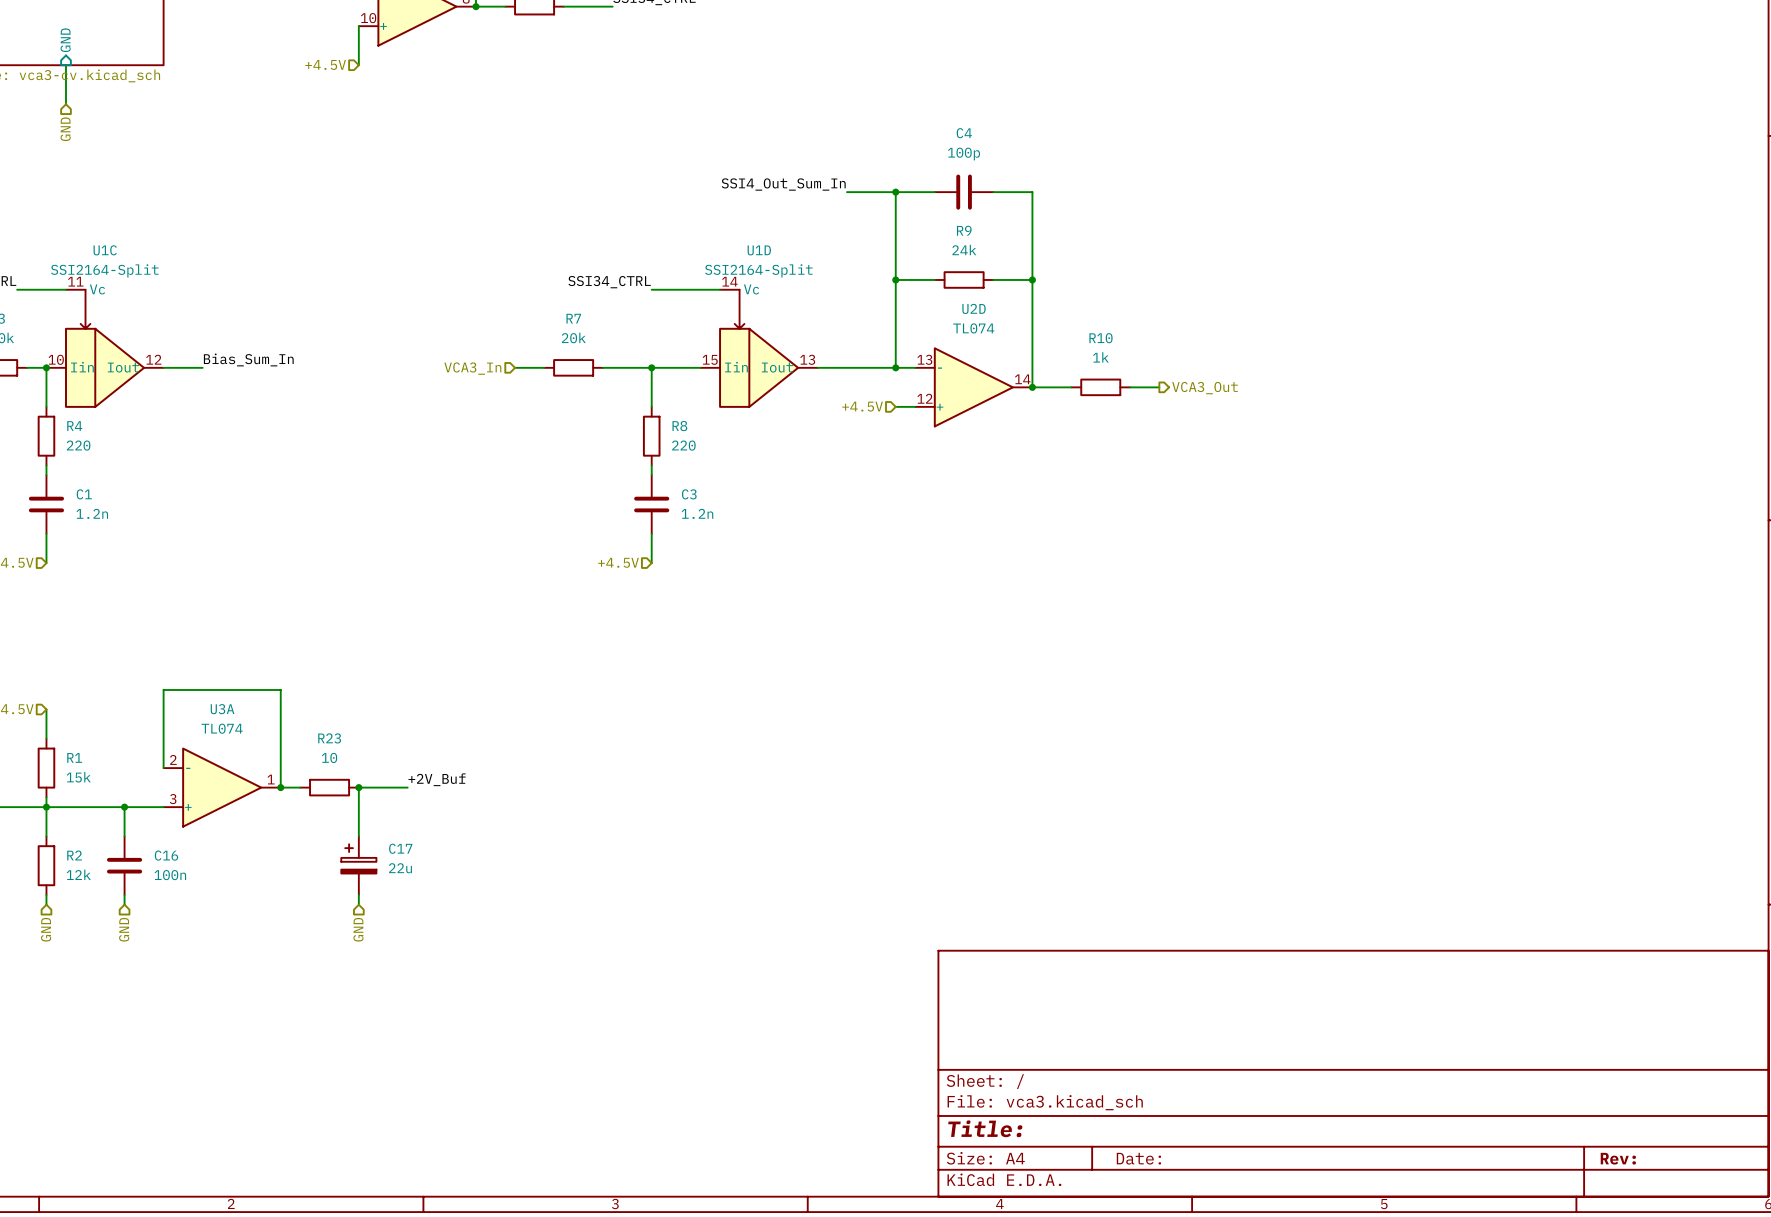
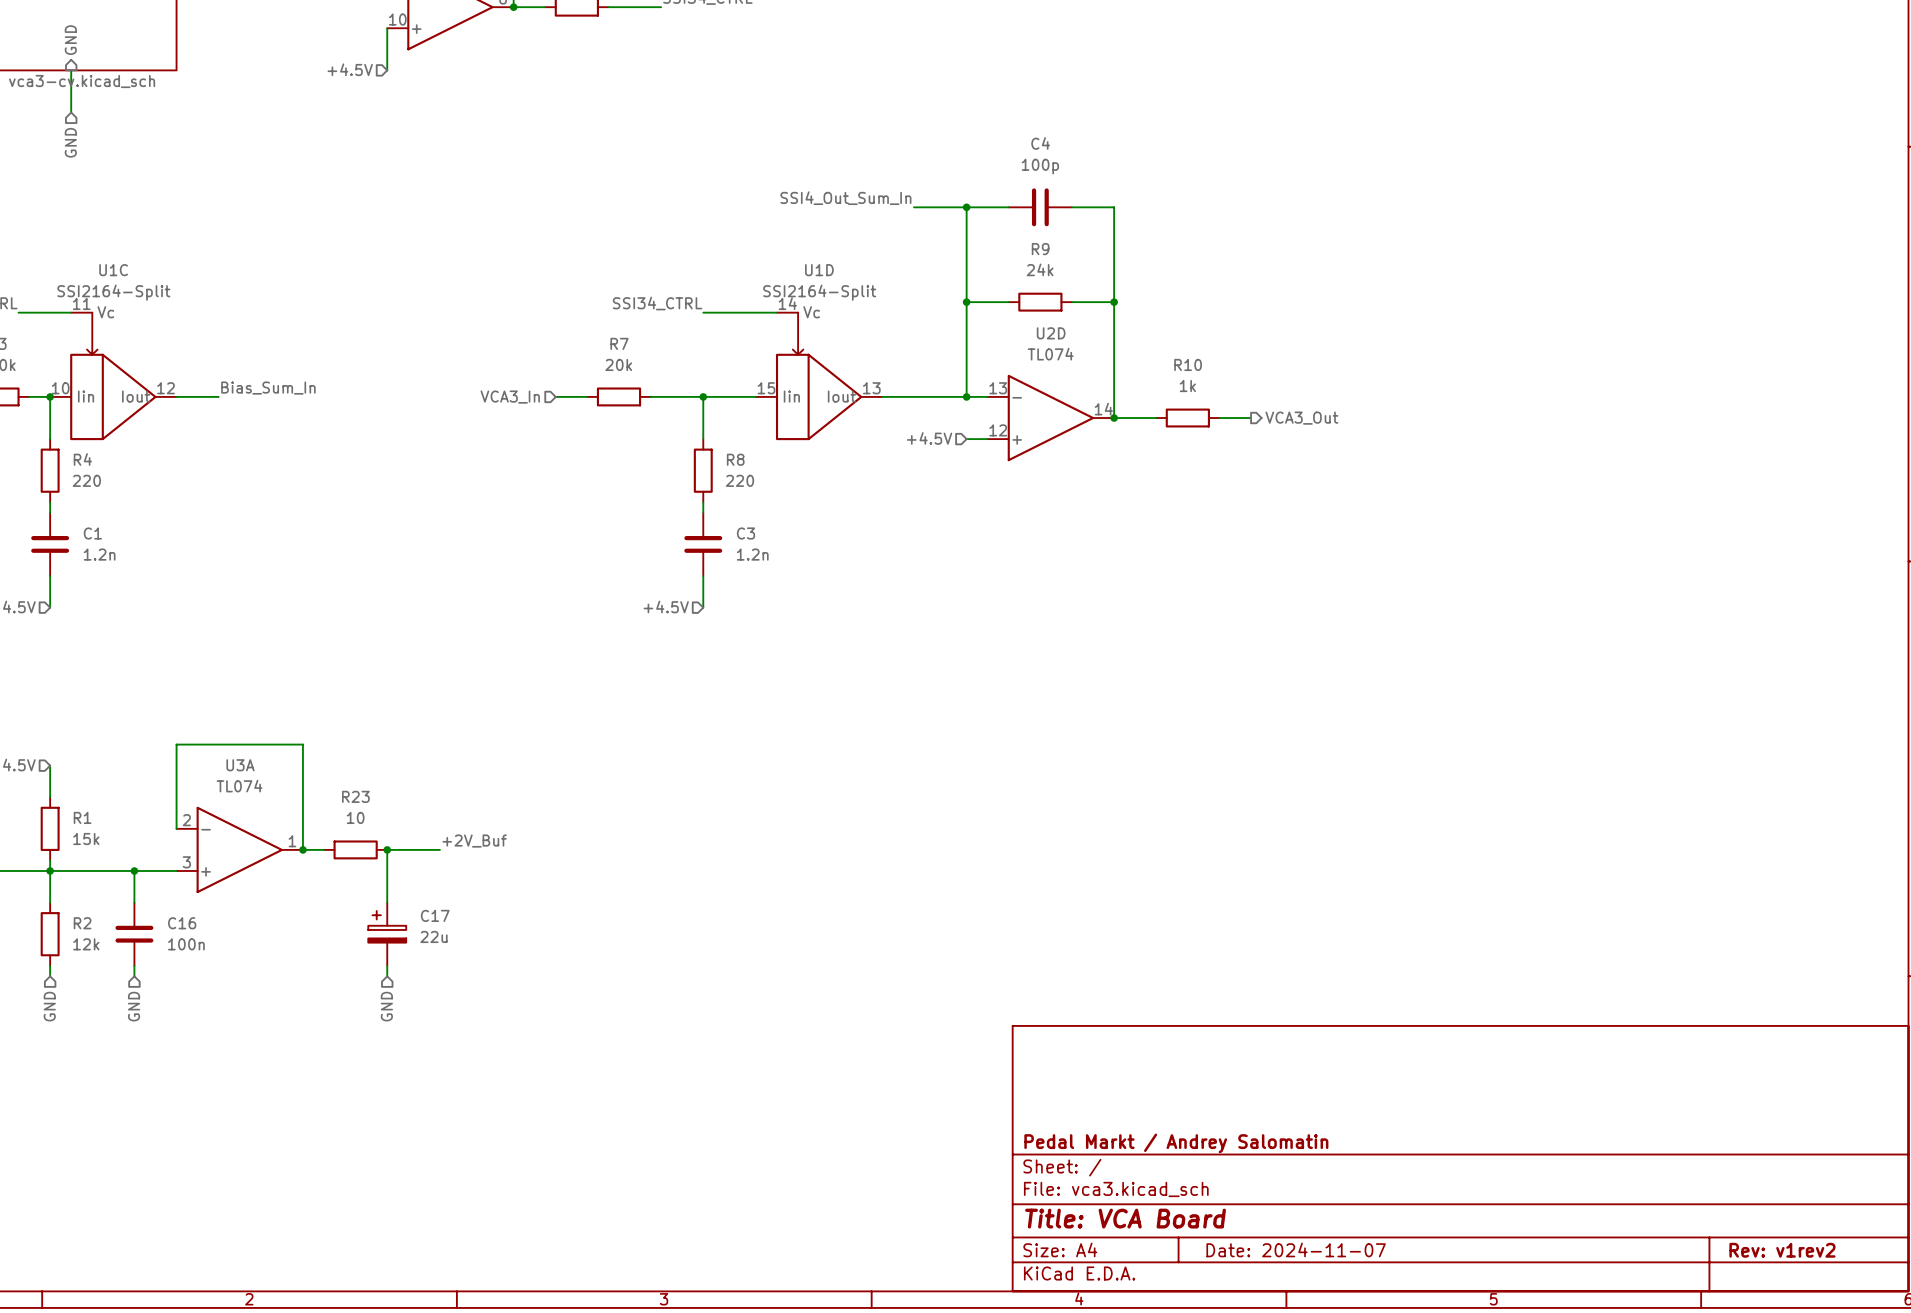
title block: none -> Pedal Markt / Andrey Salomatin (1176, 1143)
title block: Title: (985, 1128) -> Title: VCA Board (1125, 1218)
title block: Date: (1138, 1158) -> Date: 2024-11-07 (1296, 1249)
title block: Rev: (1618, 1158) -> Rev: v1rev2 (1782, 1250)

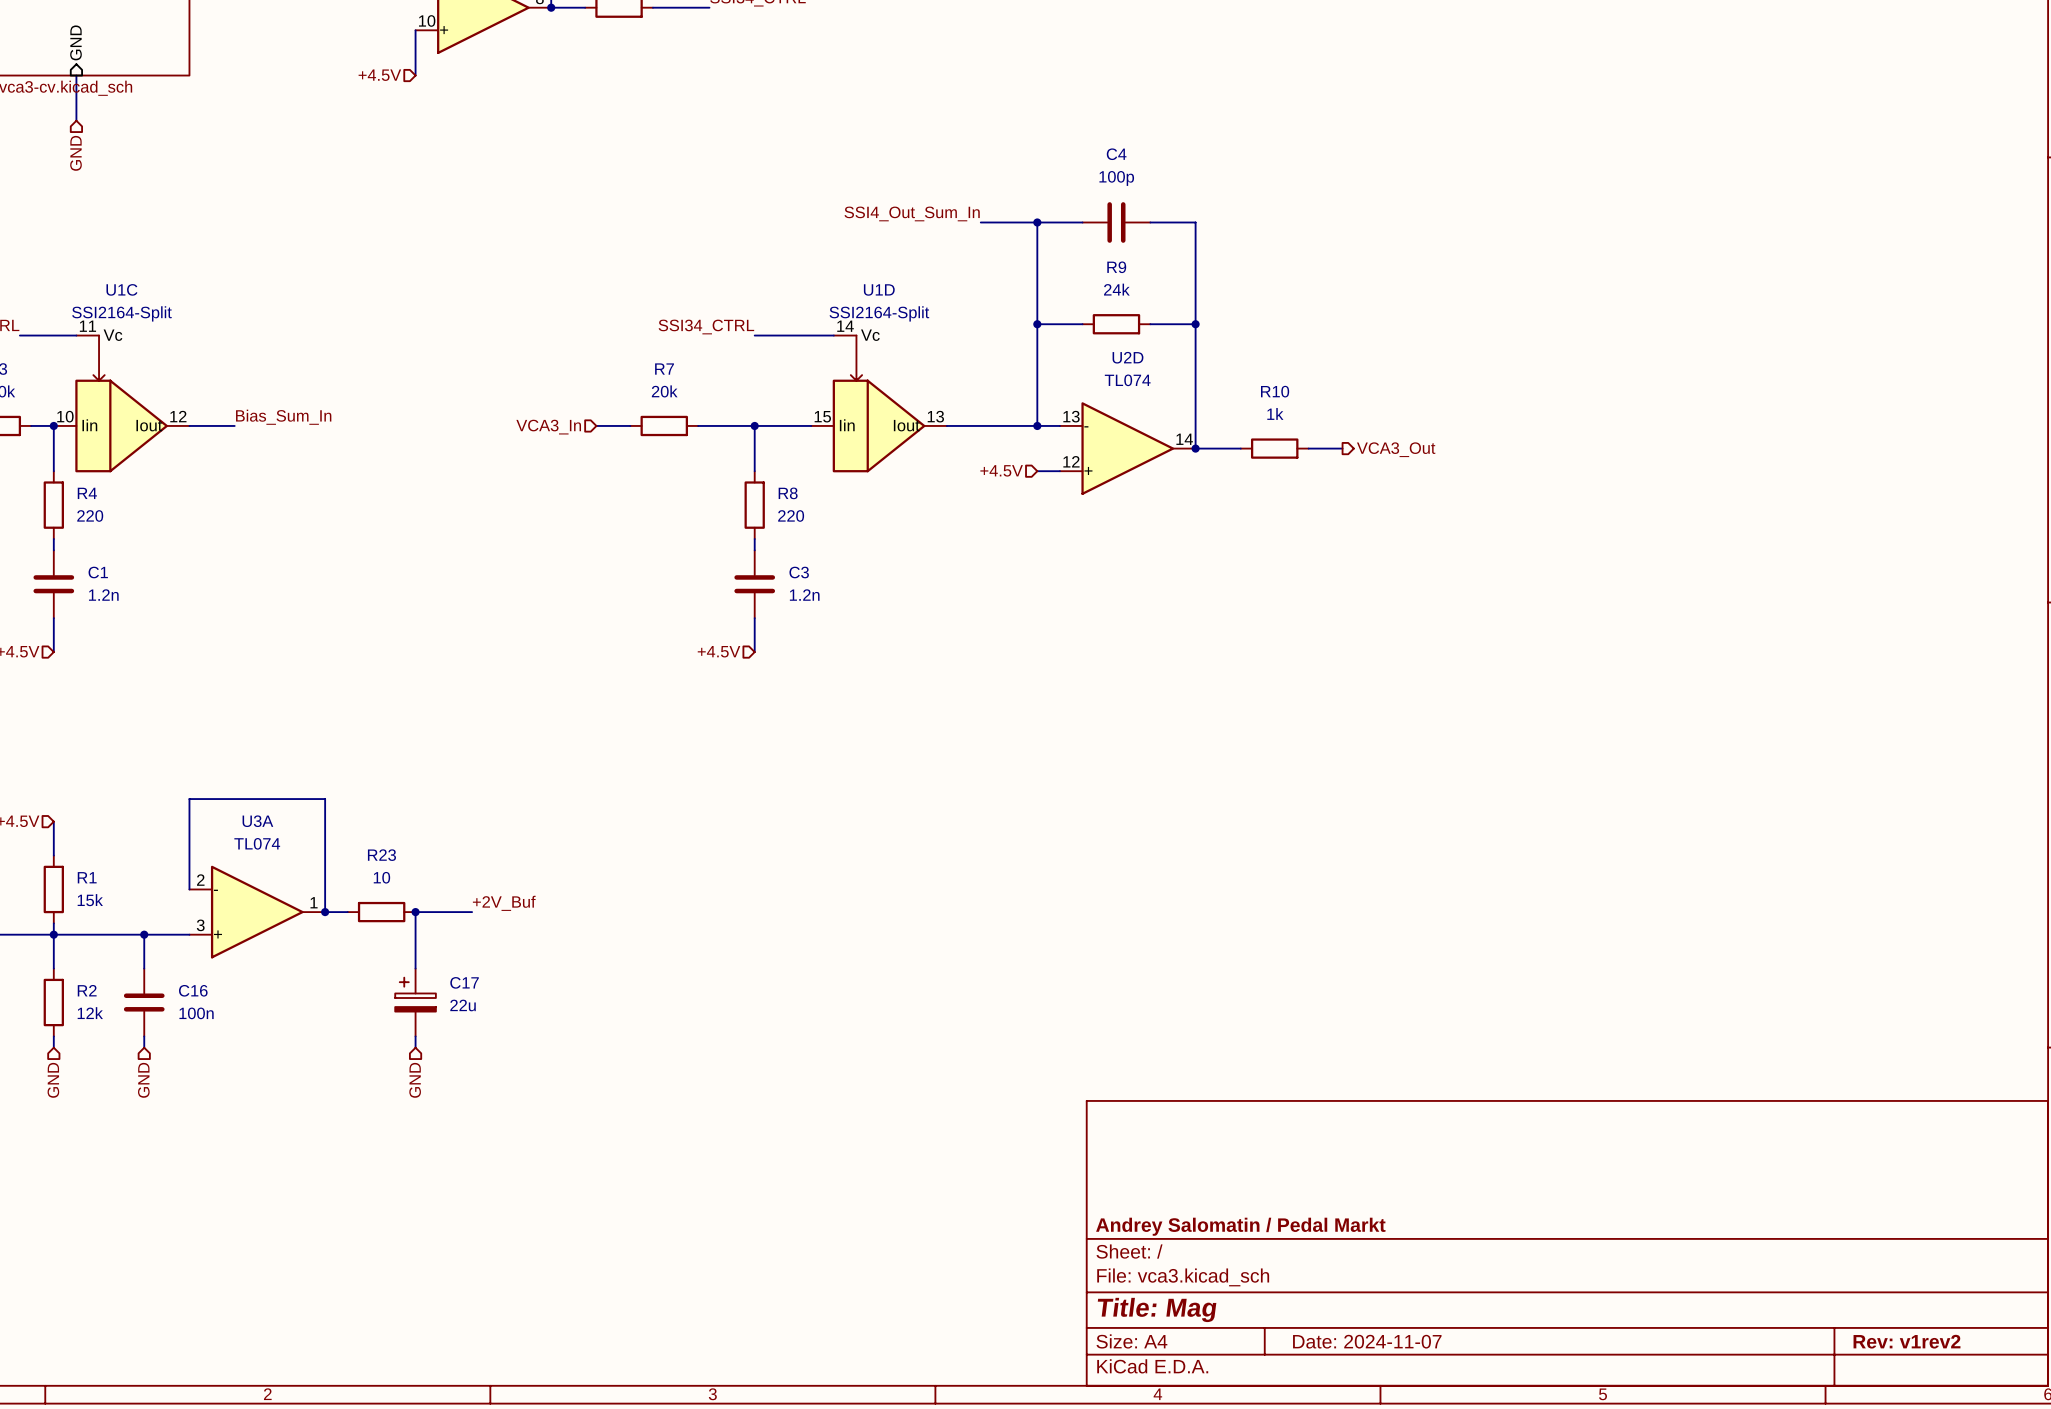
title block: Pedal Markt / Andrey Salomatin (1176, 1143) -> Andrey Salomatin / Pedal Markt (1240, 1226)
title block: Title: VCA Board (1125, 1218) -> Title: Mag (1157, 1309)

